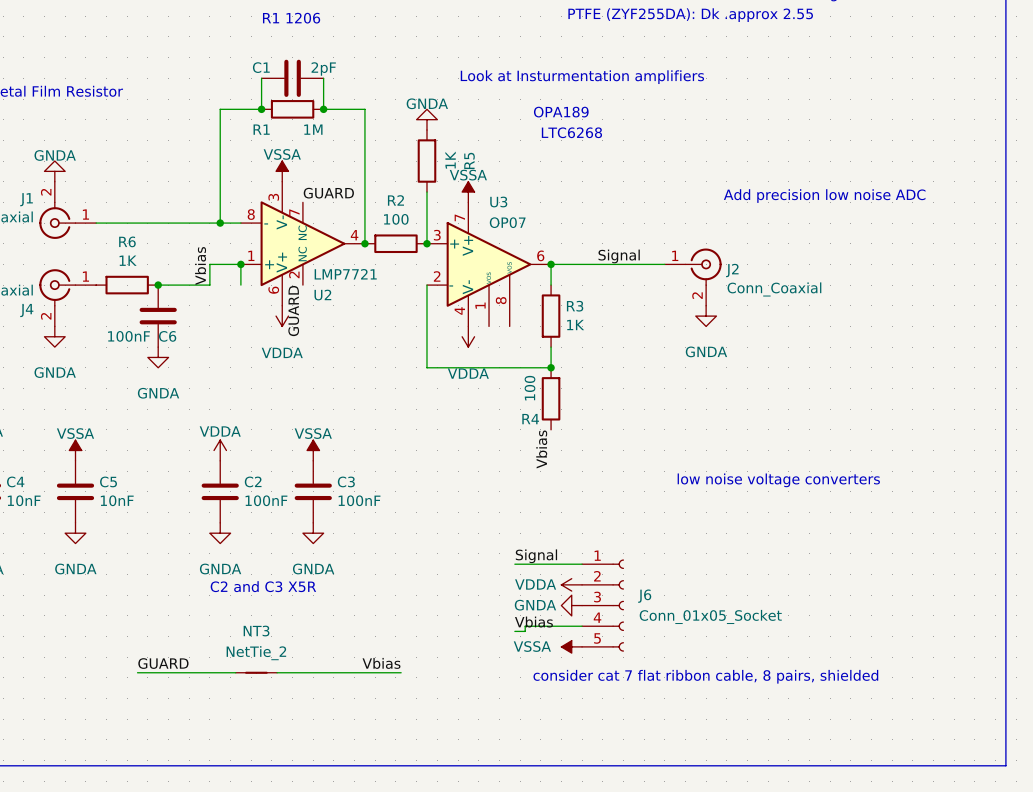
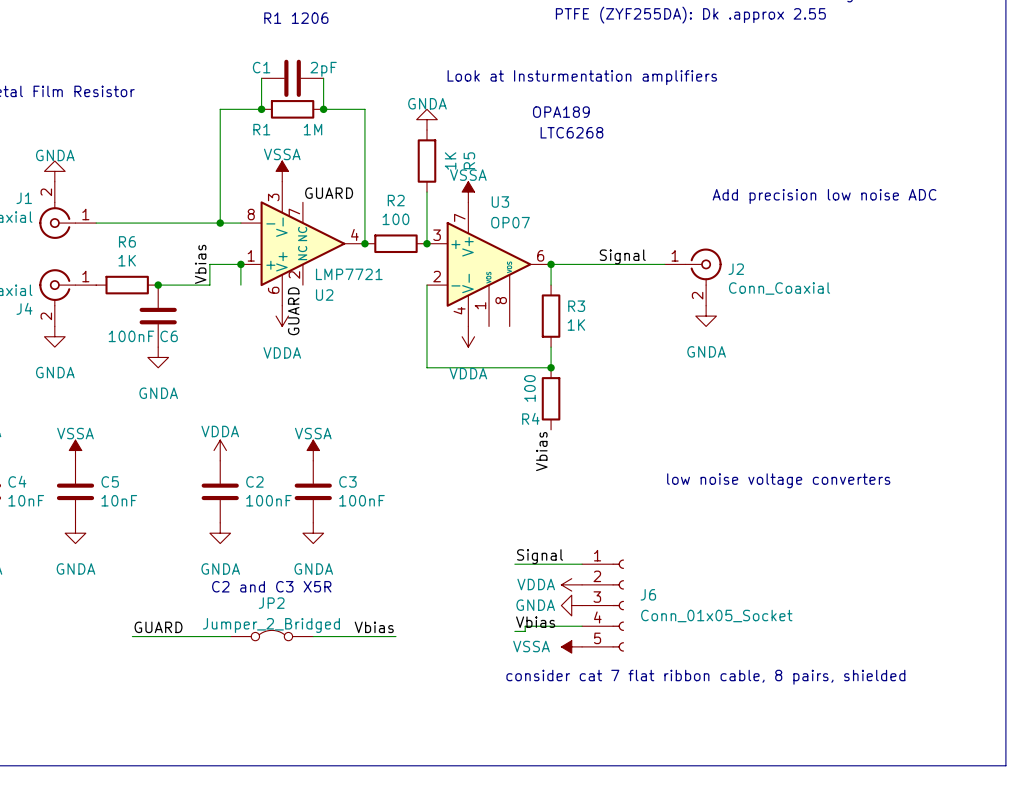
JP2: none -> Jumper_2_Bridged (271, 635)
wire: none -> (313, 636) (395, 636)
label position: GUARD (163, 663) -> GUARD (158, 627)
label position: Vbias (381, 663) -> Vbias (374, 627)
wire: (137, 672) (235, 672) -> (132, 636) (230, 636)
NT3: NetTie_2 (256, 672) -> none
wire: (277, 672) (401, 672) -> none

